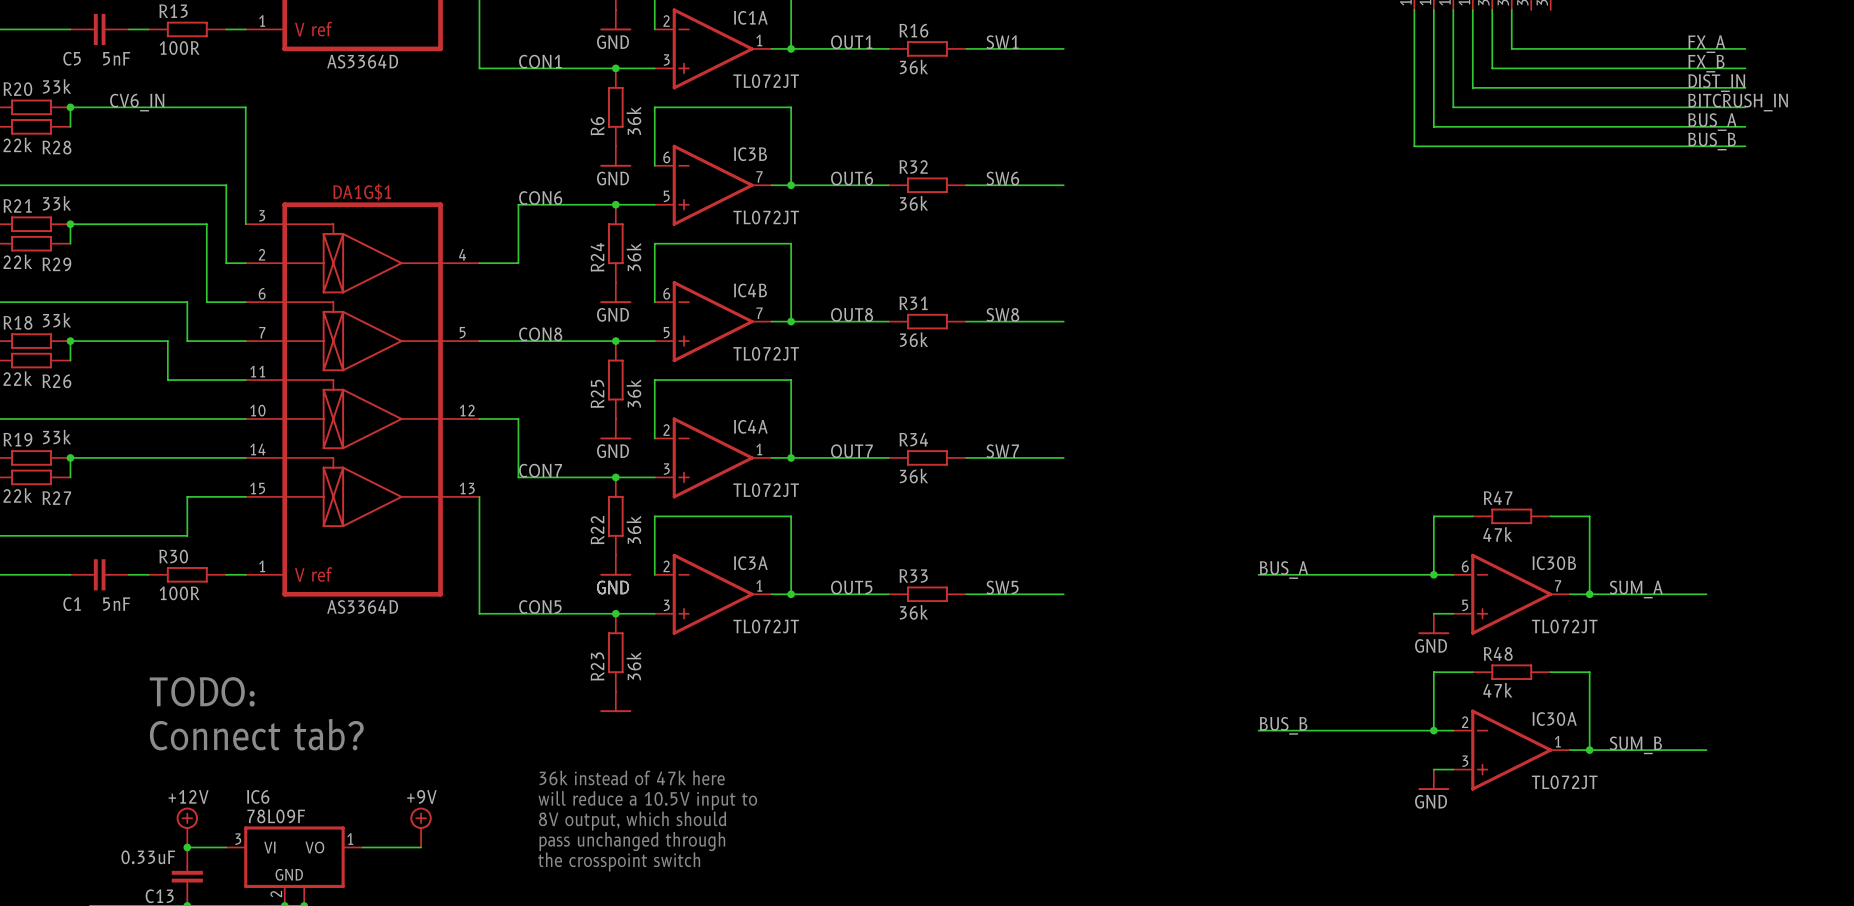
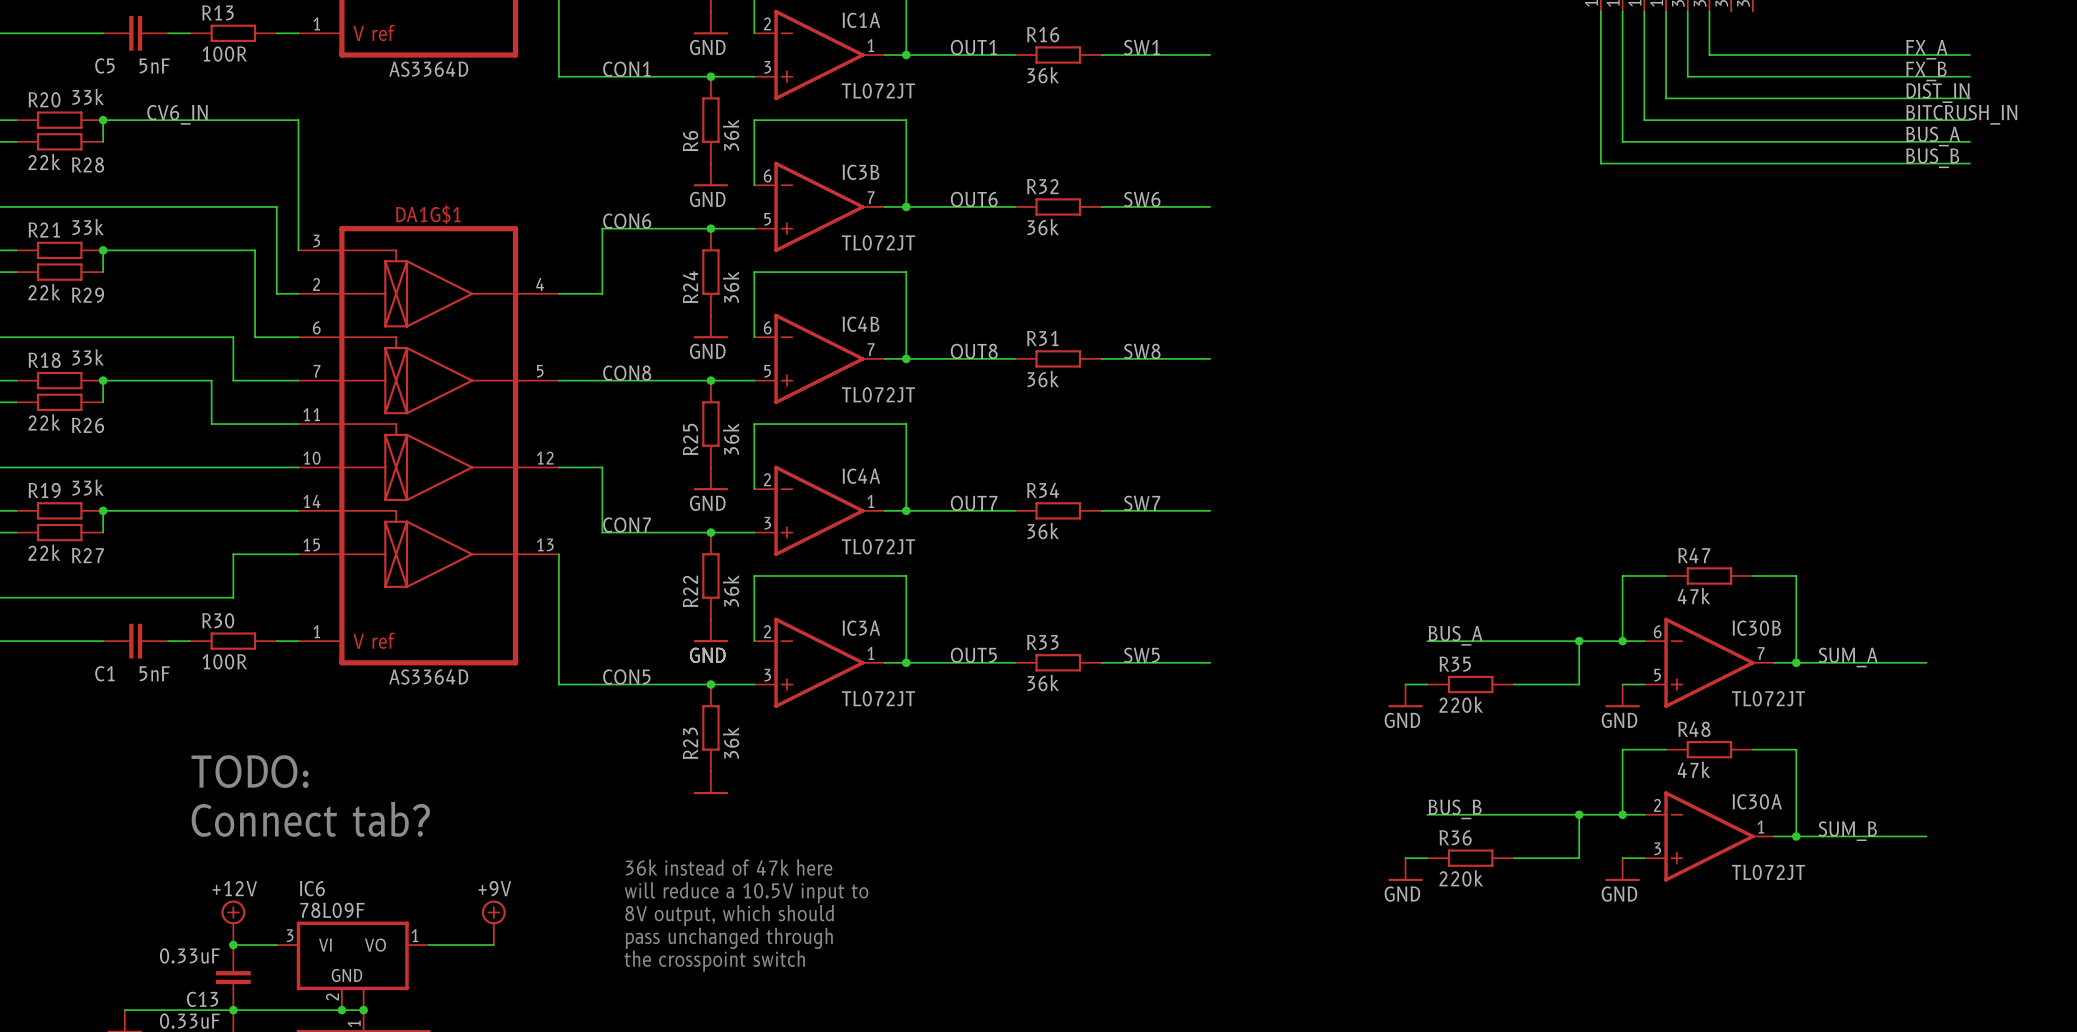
wire: none -> (1579, 641) (1579, 684) (1514, 684)
junction: none -> (1579, 641)
wire: none -> (1405, 684) (1427, 684)
R35: none -> 220k (1470, 684)
power symbol: none -> GND (1405, 695)
wire: none -> (1579, 814) (1579, 858) (1514, 858)
junction: none -> (1579, 814)
wire: none -> (1405, 858) (1427, 858)
R36: none -> 220k (1470, 858)
power symbol: none -> GND (1405, 869)

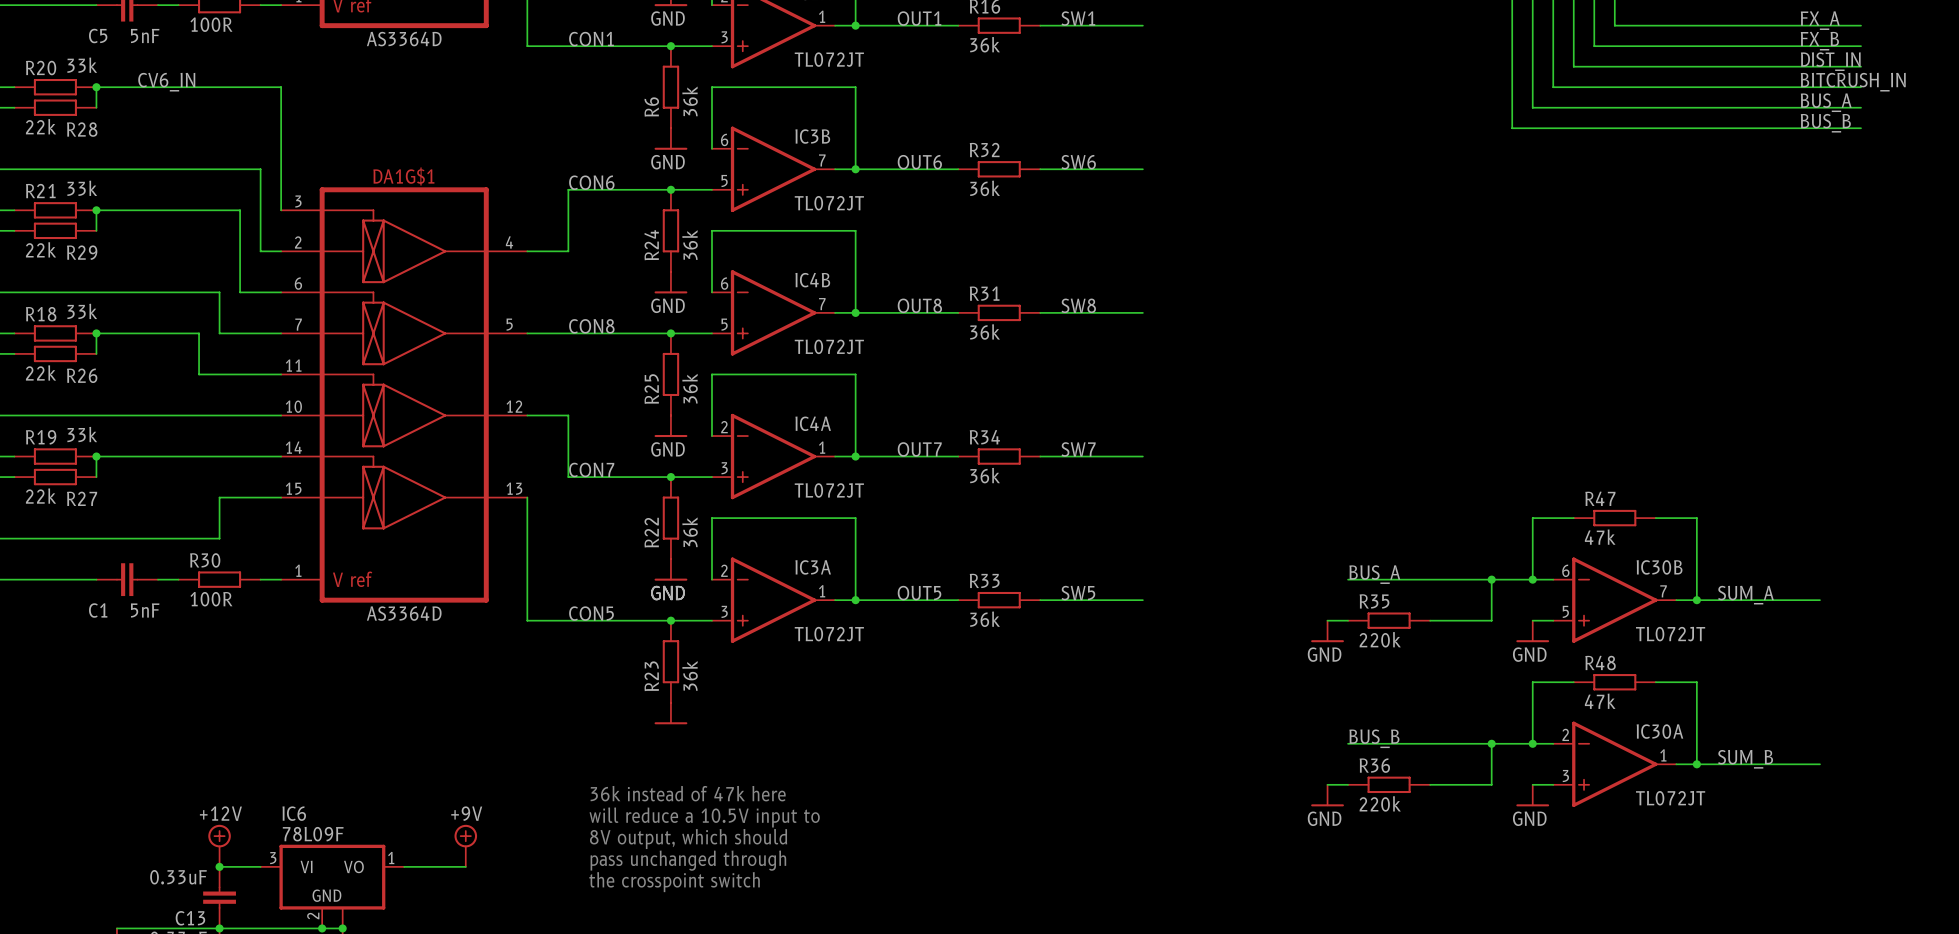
text: TODO: (249, 771) -> none
text: Connect tab? (310, 819) -> none

